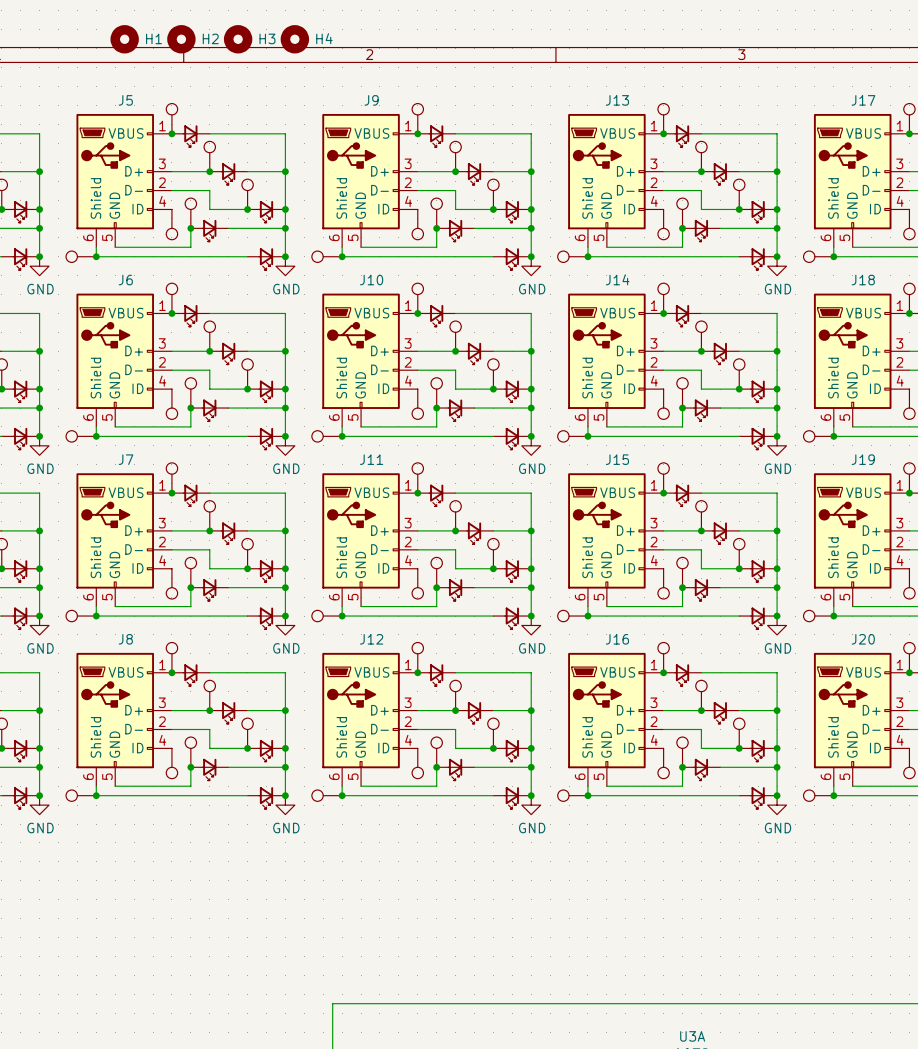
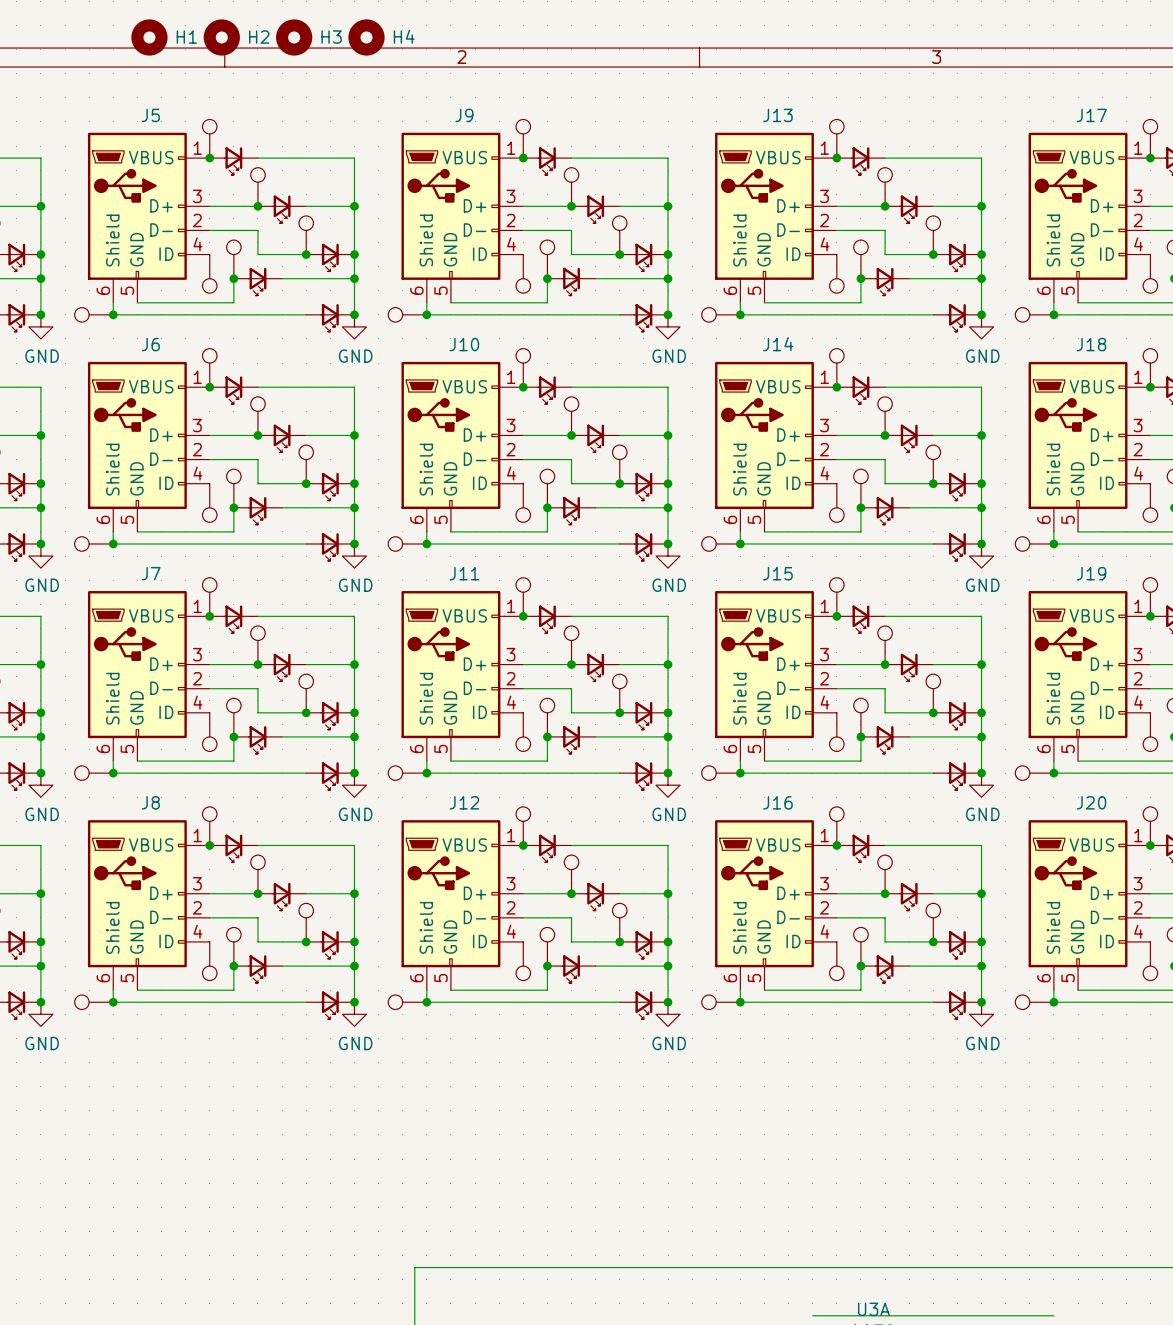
wire: none -> (812, 1315) (1053, 1315)

